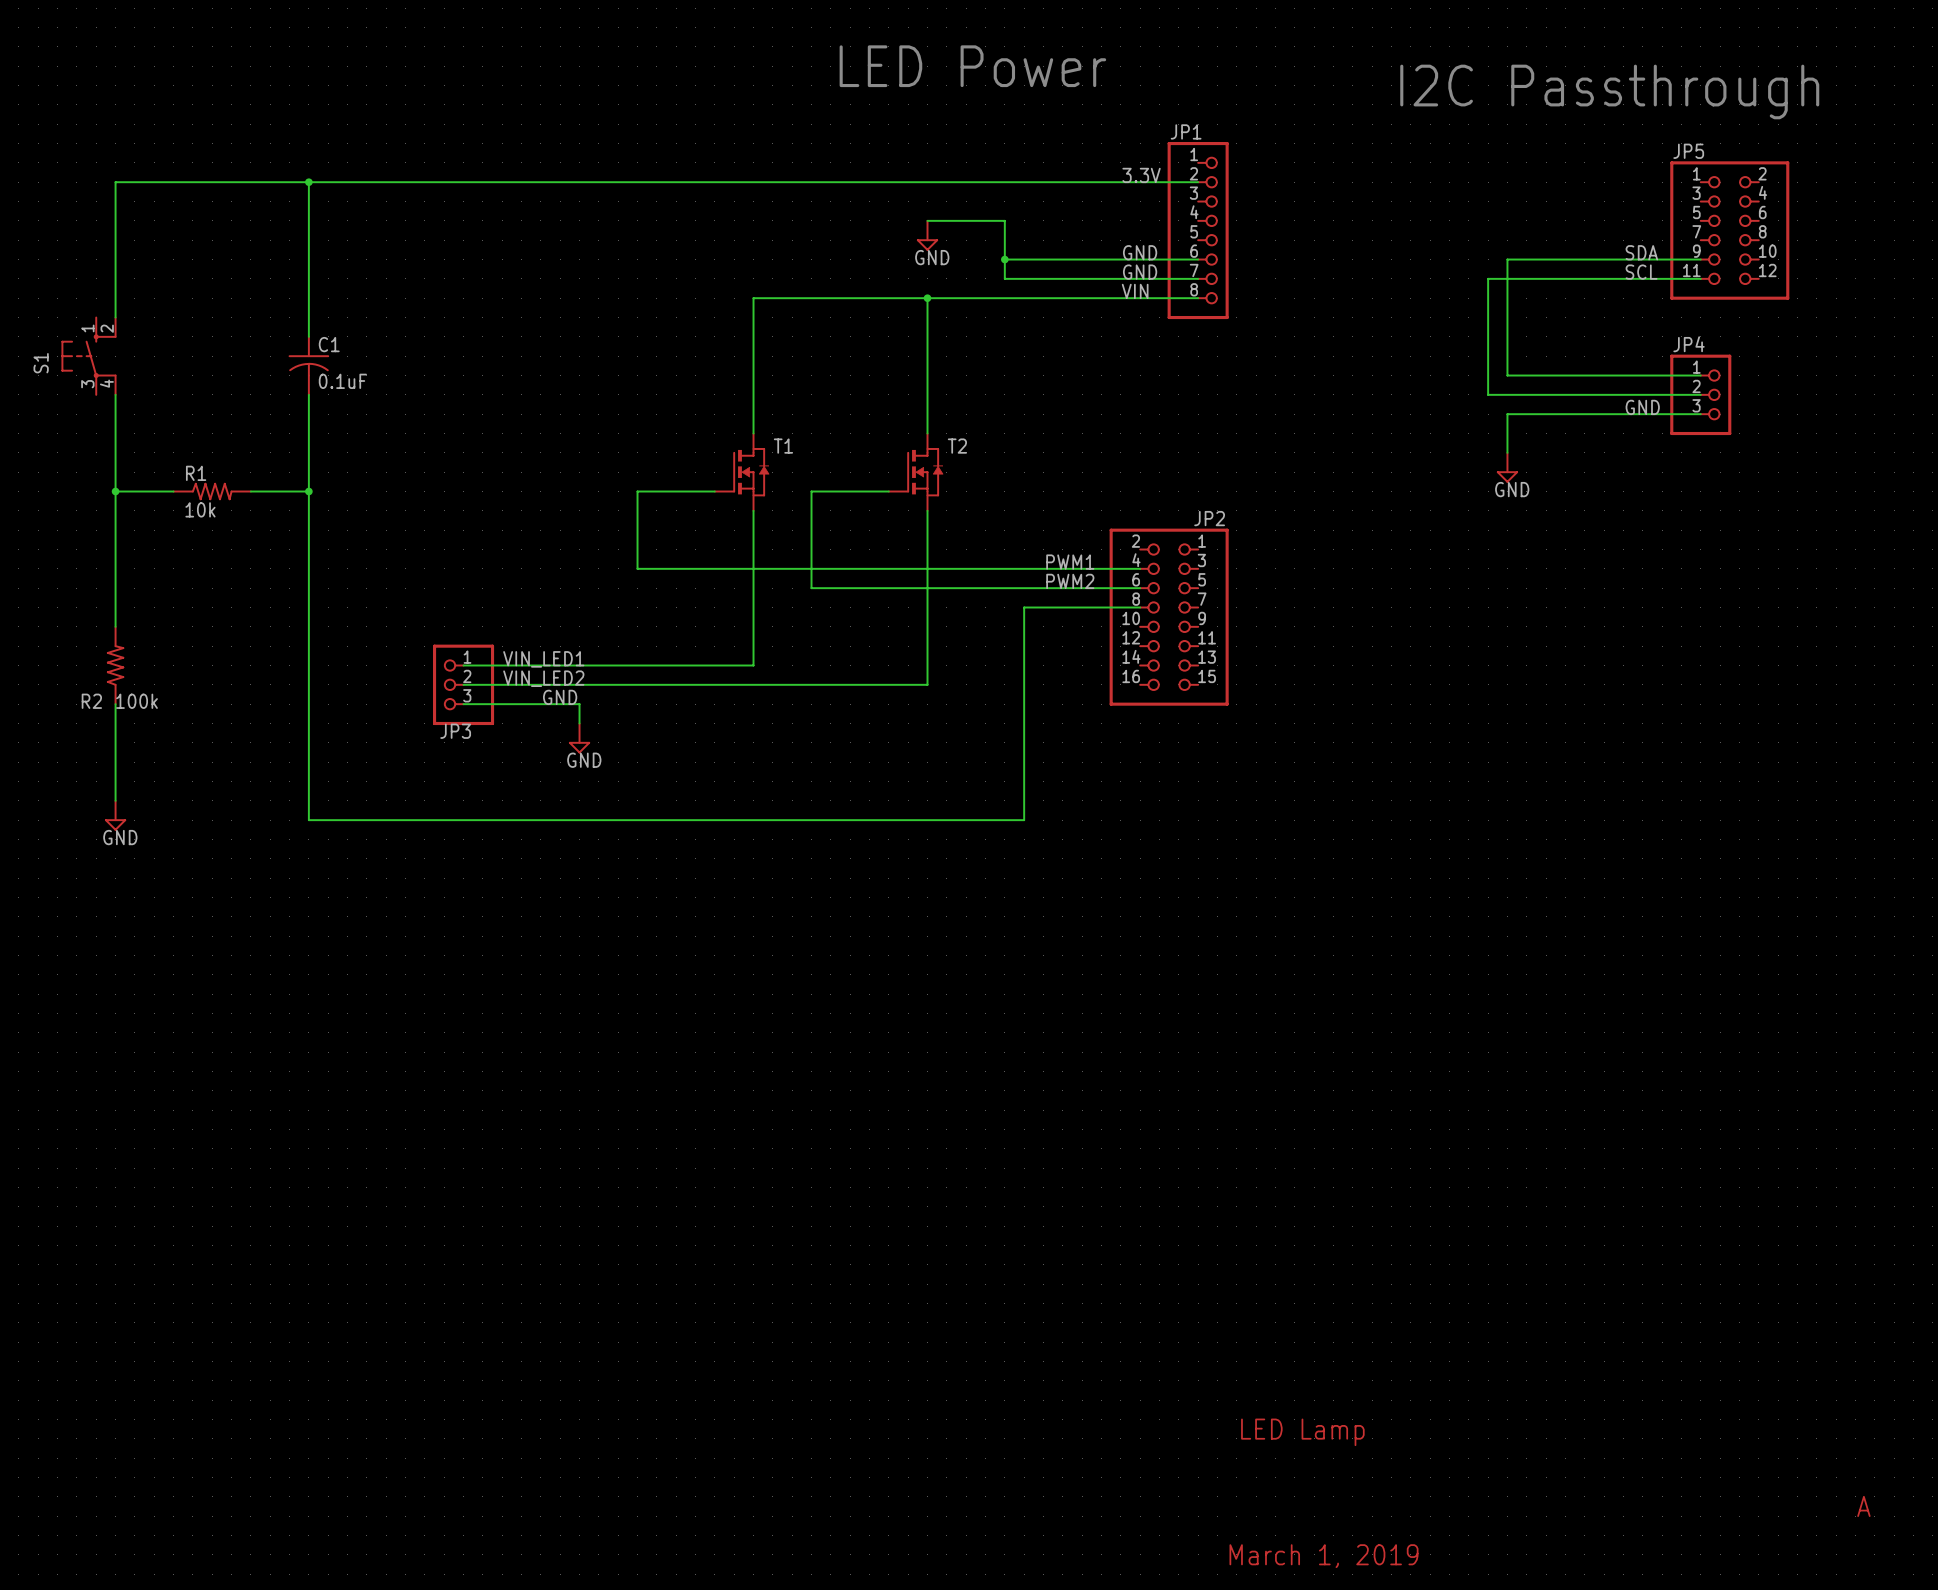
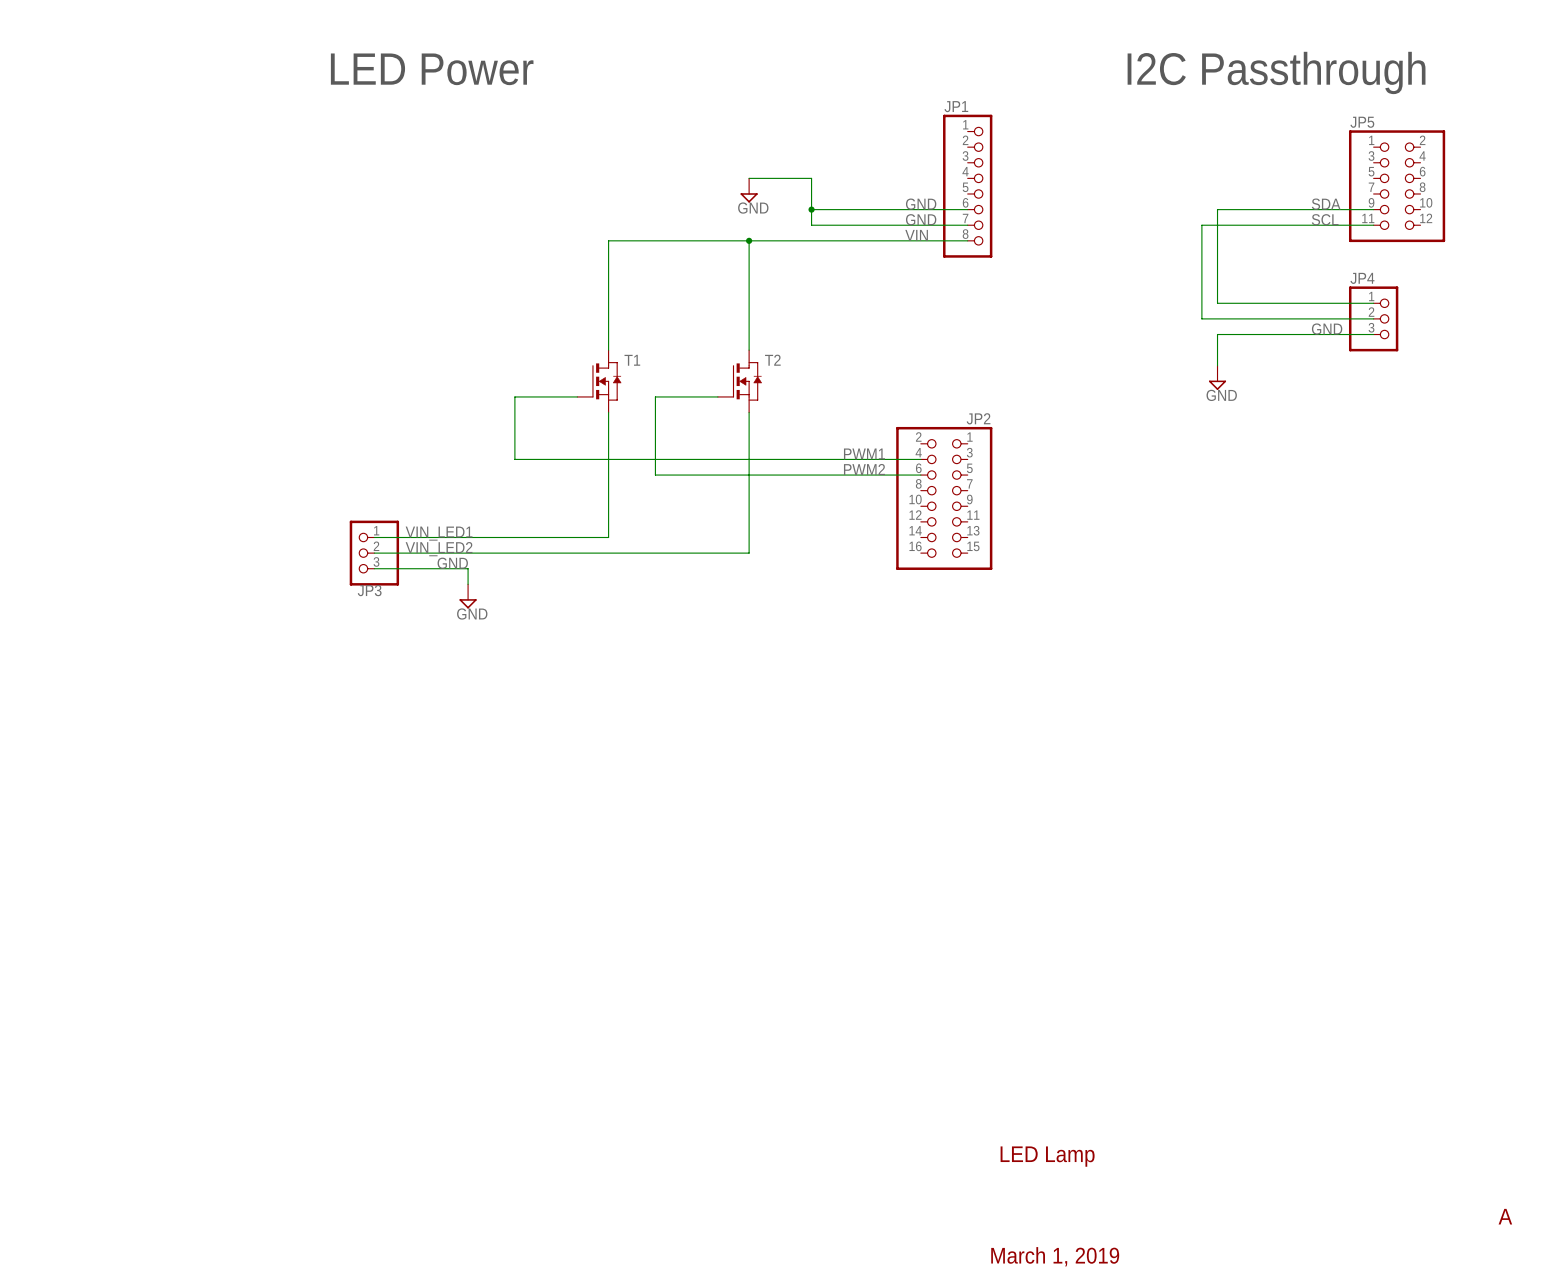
text: LED Power (972, 66) -> none
text: none -> LED Power (432, 69)
label: 3.3V (1141, 175) -> none
wire: (308, 182) (308, 336) -> none
junction: (308, 182) -> none
wire: (1198, 182) (115, 182) (115, 317) -> none
S1: (88, 356) -> none
C1: 0.1uF (308, 365) -> none
wire: (115, 394) (115, 626) -> none
wire: (308, 394) (308, 820) (1024, 820) (1024, 607) (1140, 607) -> none
wire: (115, 491) (173, 491) -> none
junction: (115, 491) -> none
R1: 10k (212, 491) -> none
wire: (250, 491) (308, 491) -> none
junction: (308, 491) -> none
R2: 100k (115, 665) -> none
wire: (115, 704) (115, 800) -> none
power symbol: GND (115, 815) -> none

